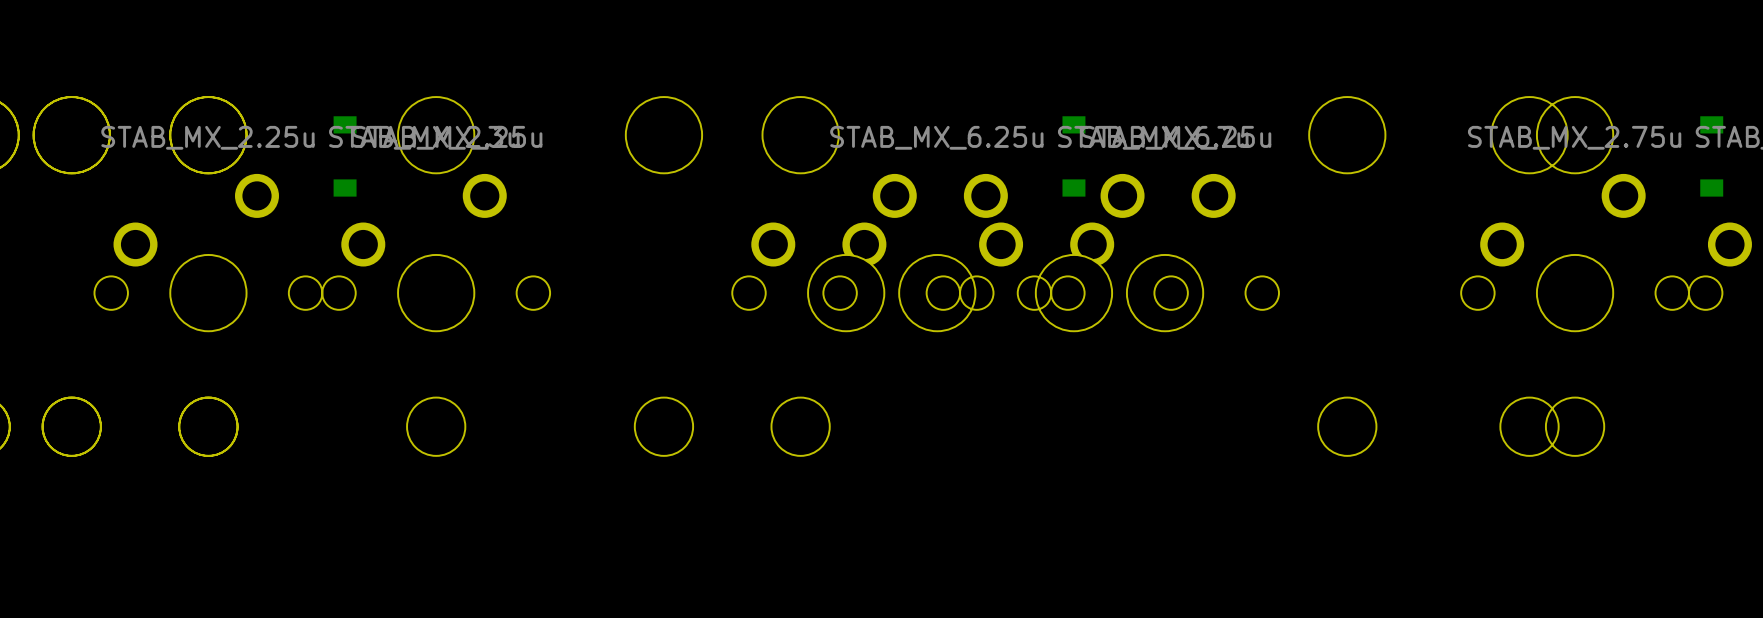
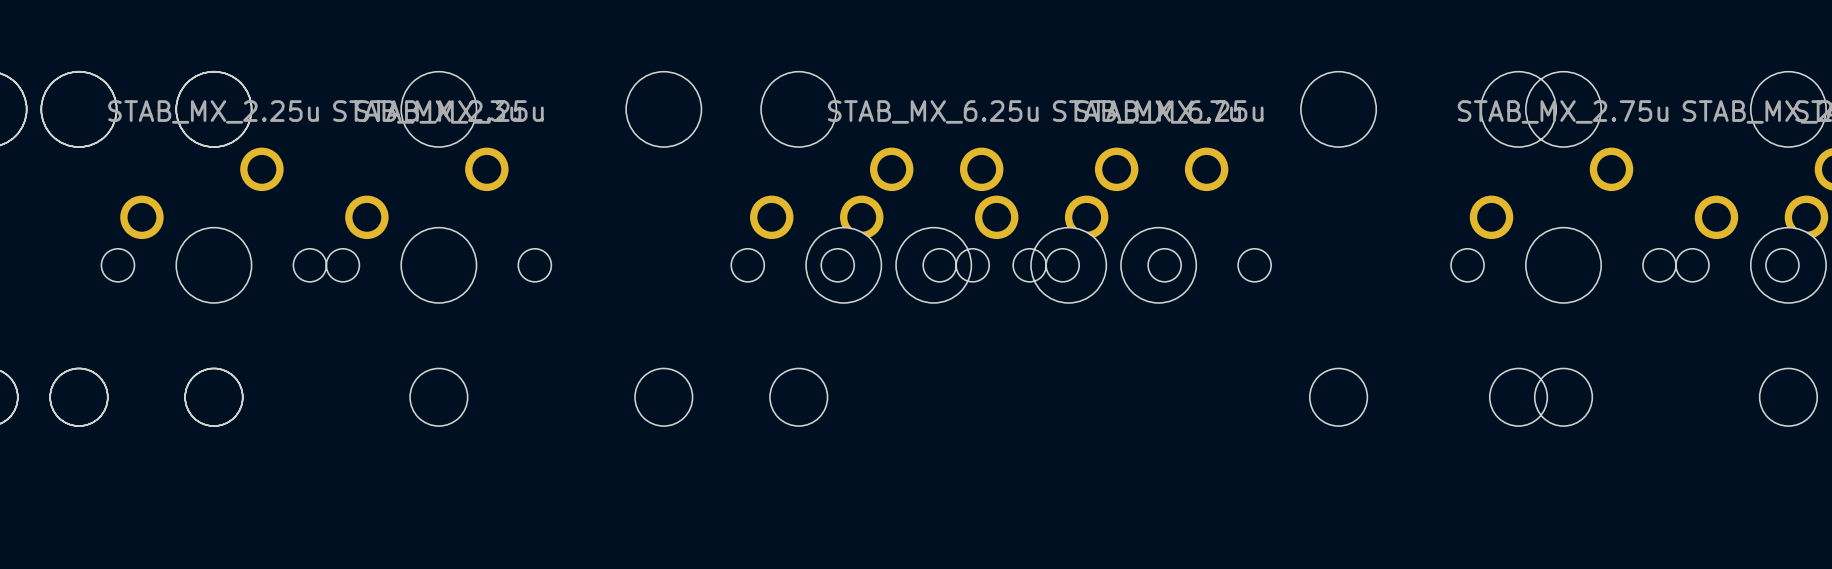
part: (345, 156) -> none
part: (1073, 156) -> none
part: (1711, 156) -> none

